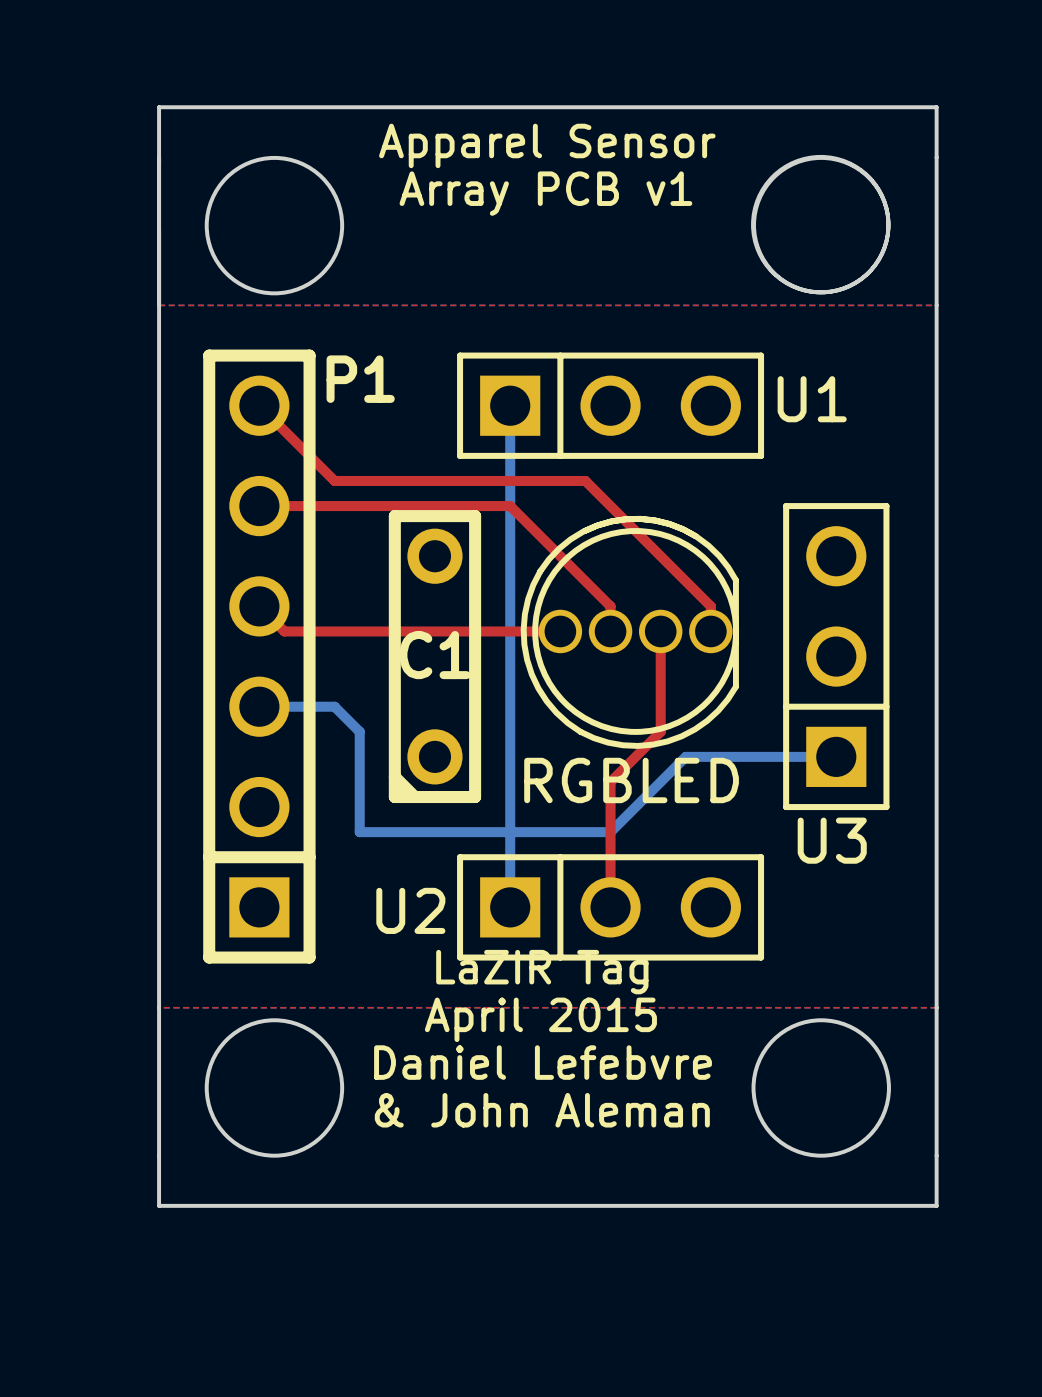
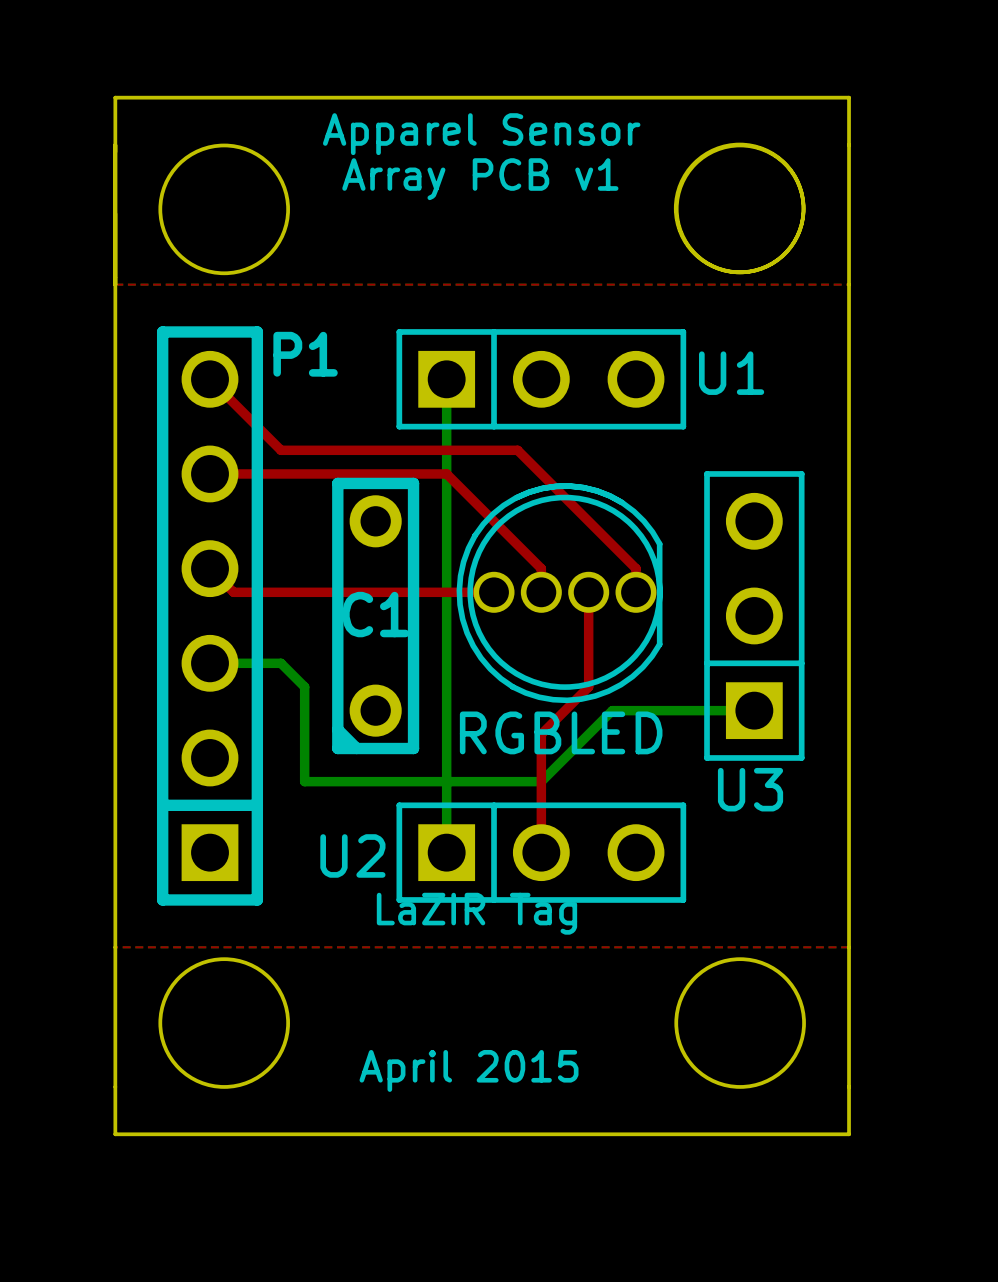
text position: April 2015 (540, 1019) -> April 2015 (469, 1070)
text: Daniel Lefebvre (543, 1062) -> none
text: & John Aleman (542, 1110) -> none

